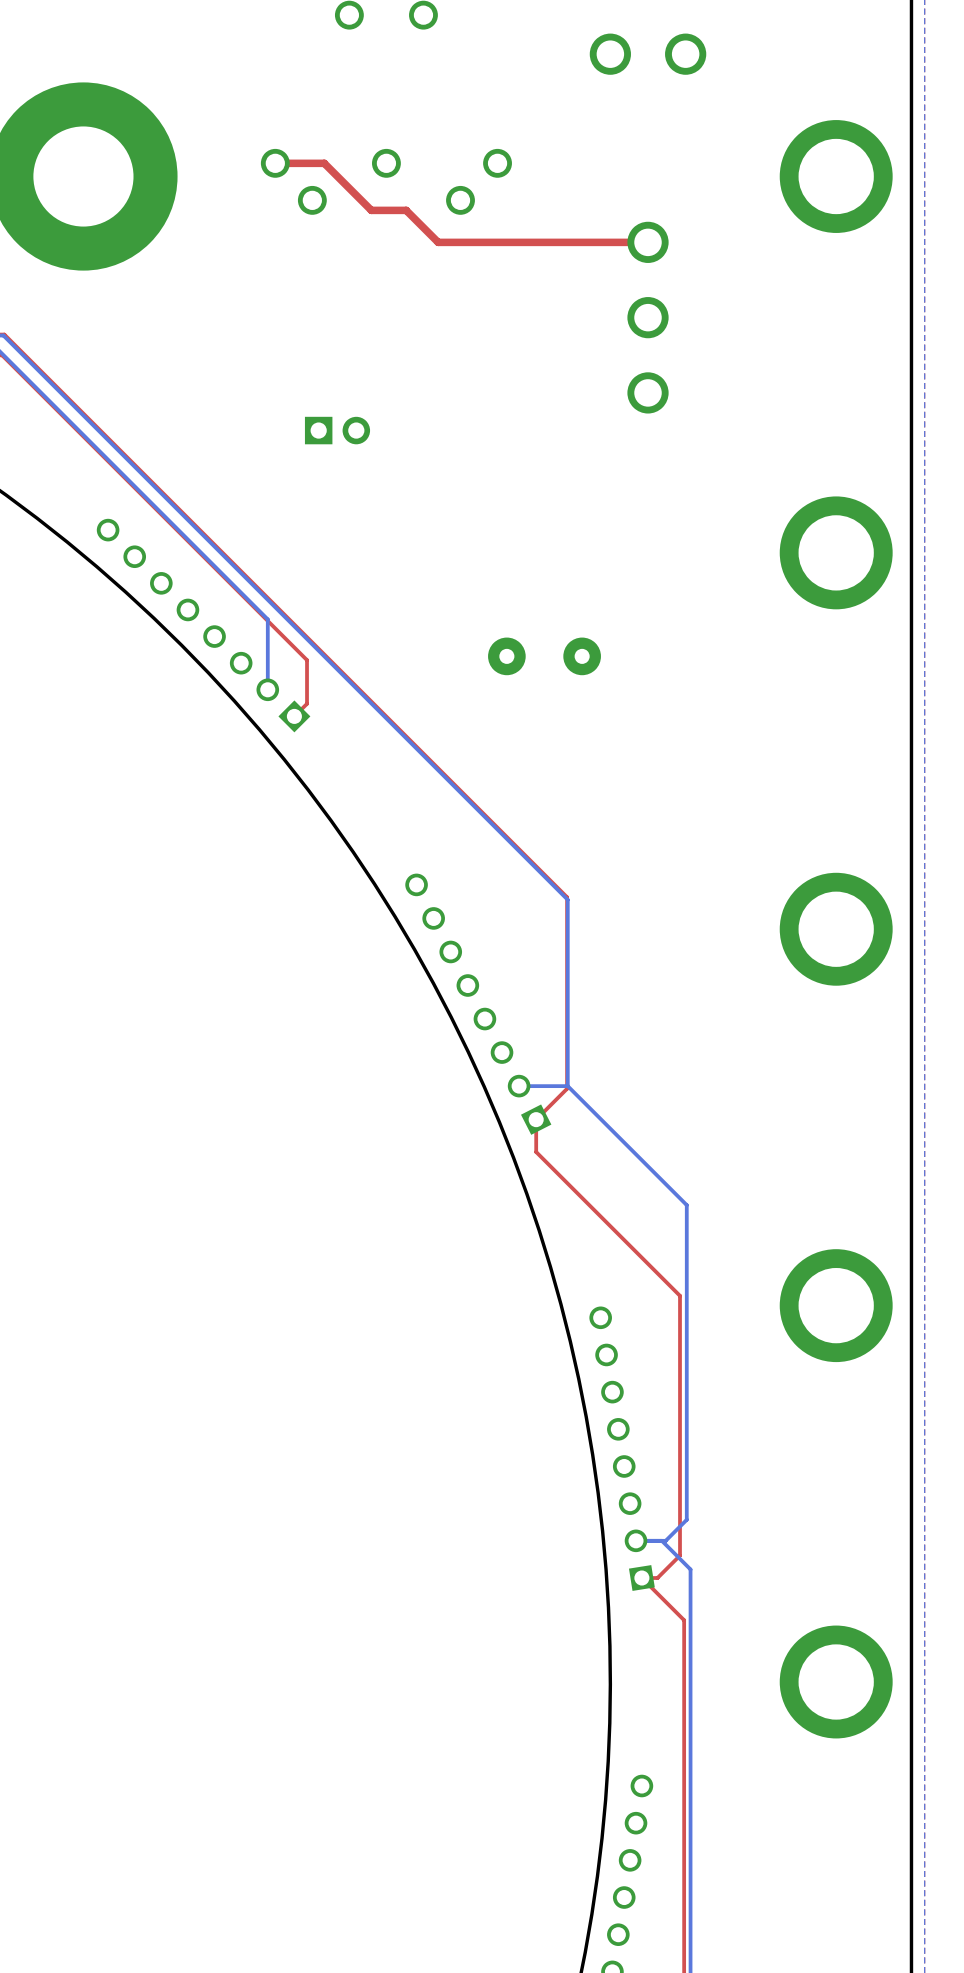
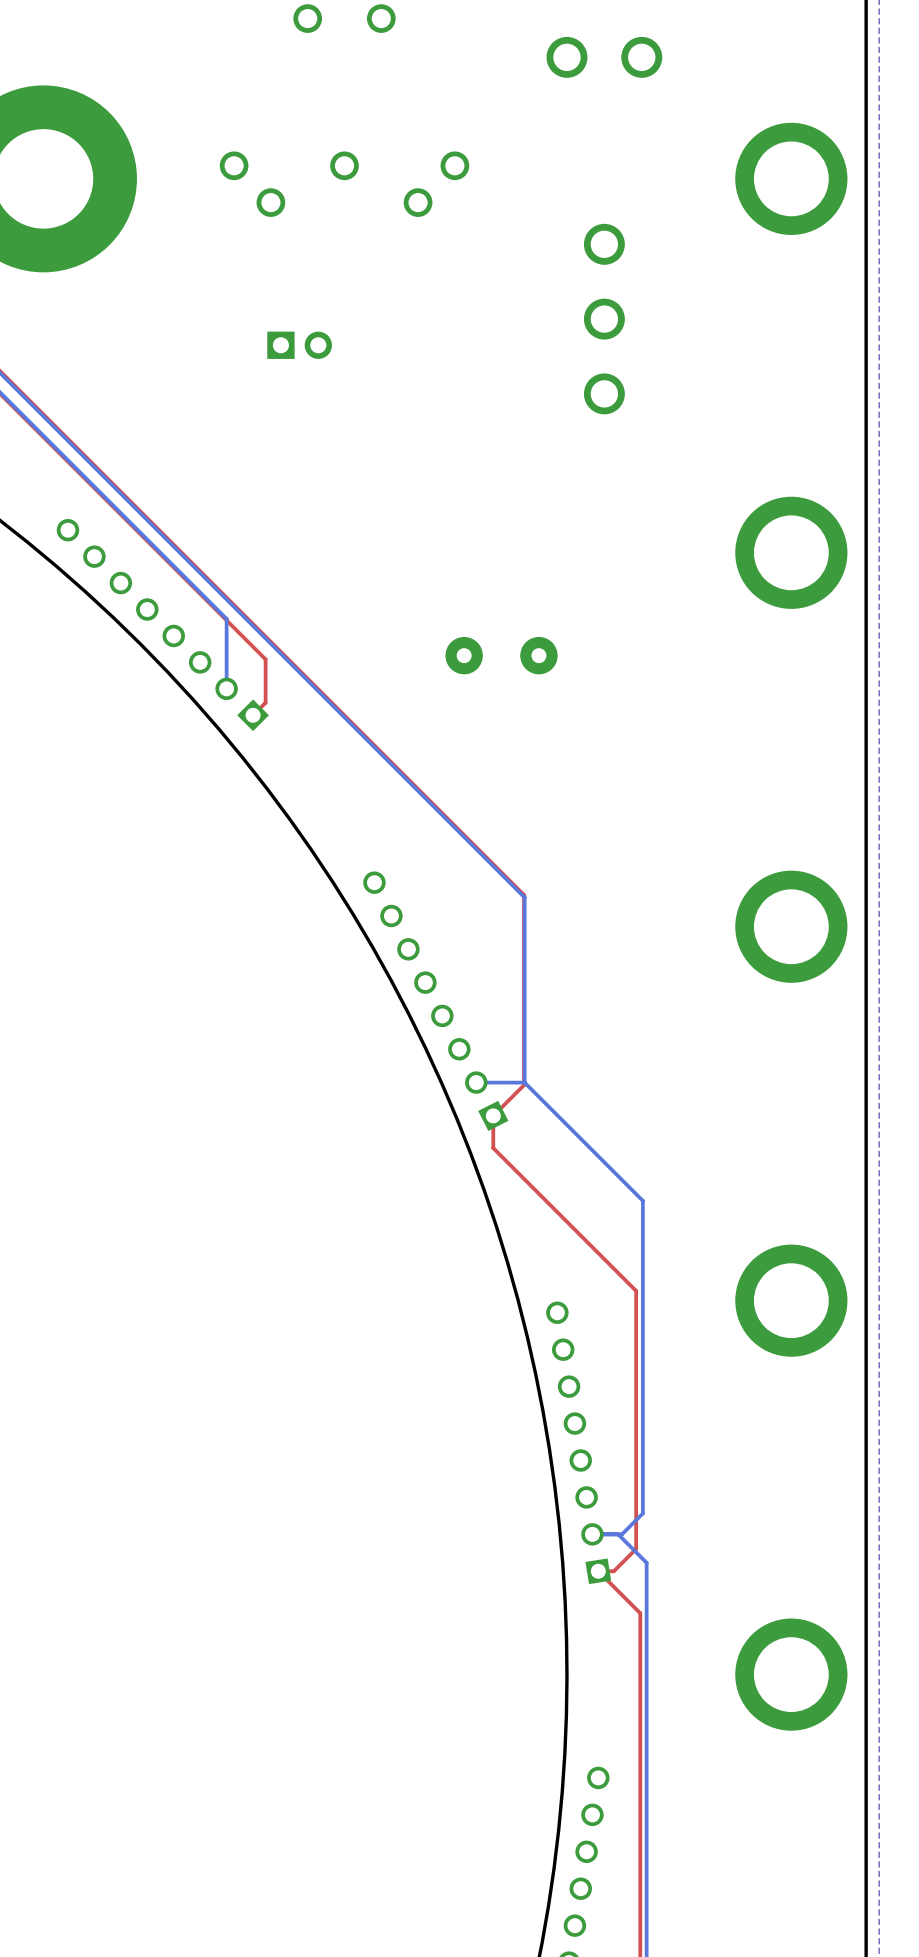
top track: (275, 163) (324, 163) (371, 210) (406, 210) (438, 242) (648, 242) -> none
part position: (337, 430) -> (299, 345)

